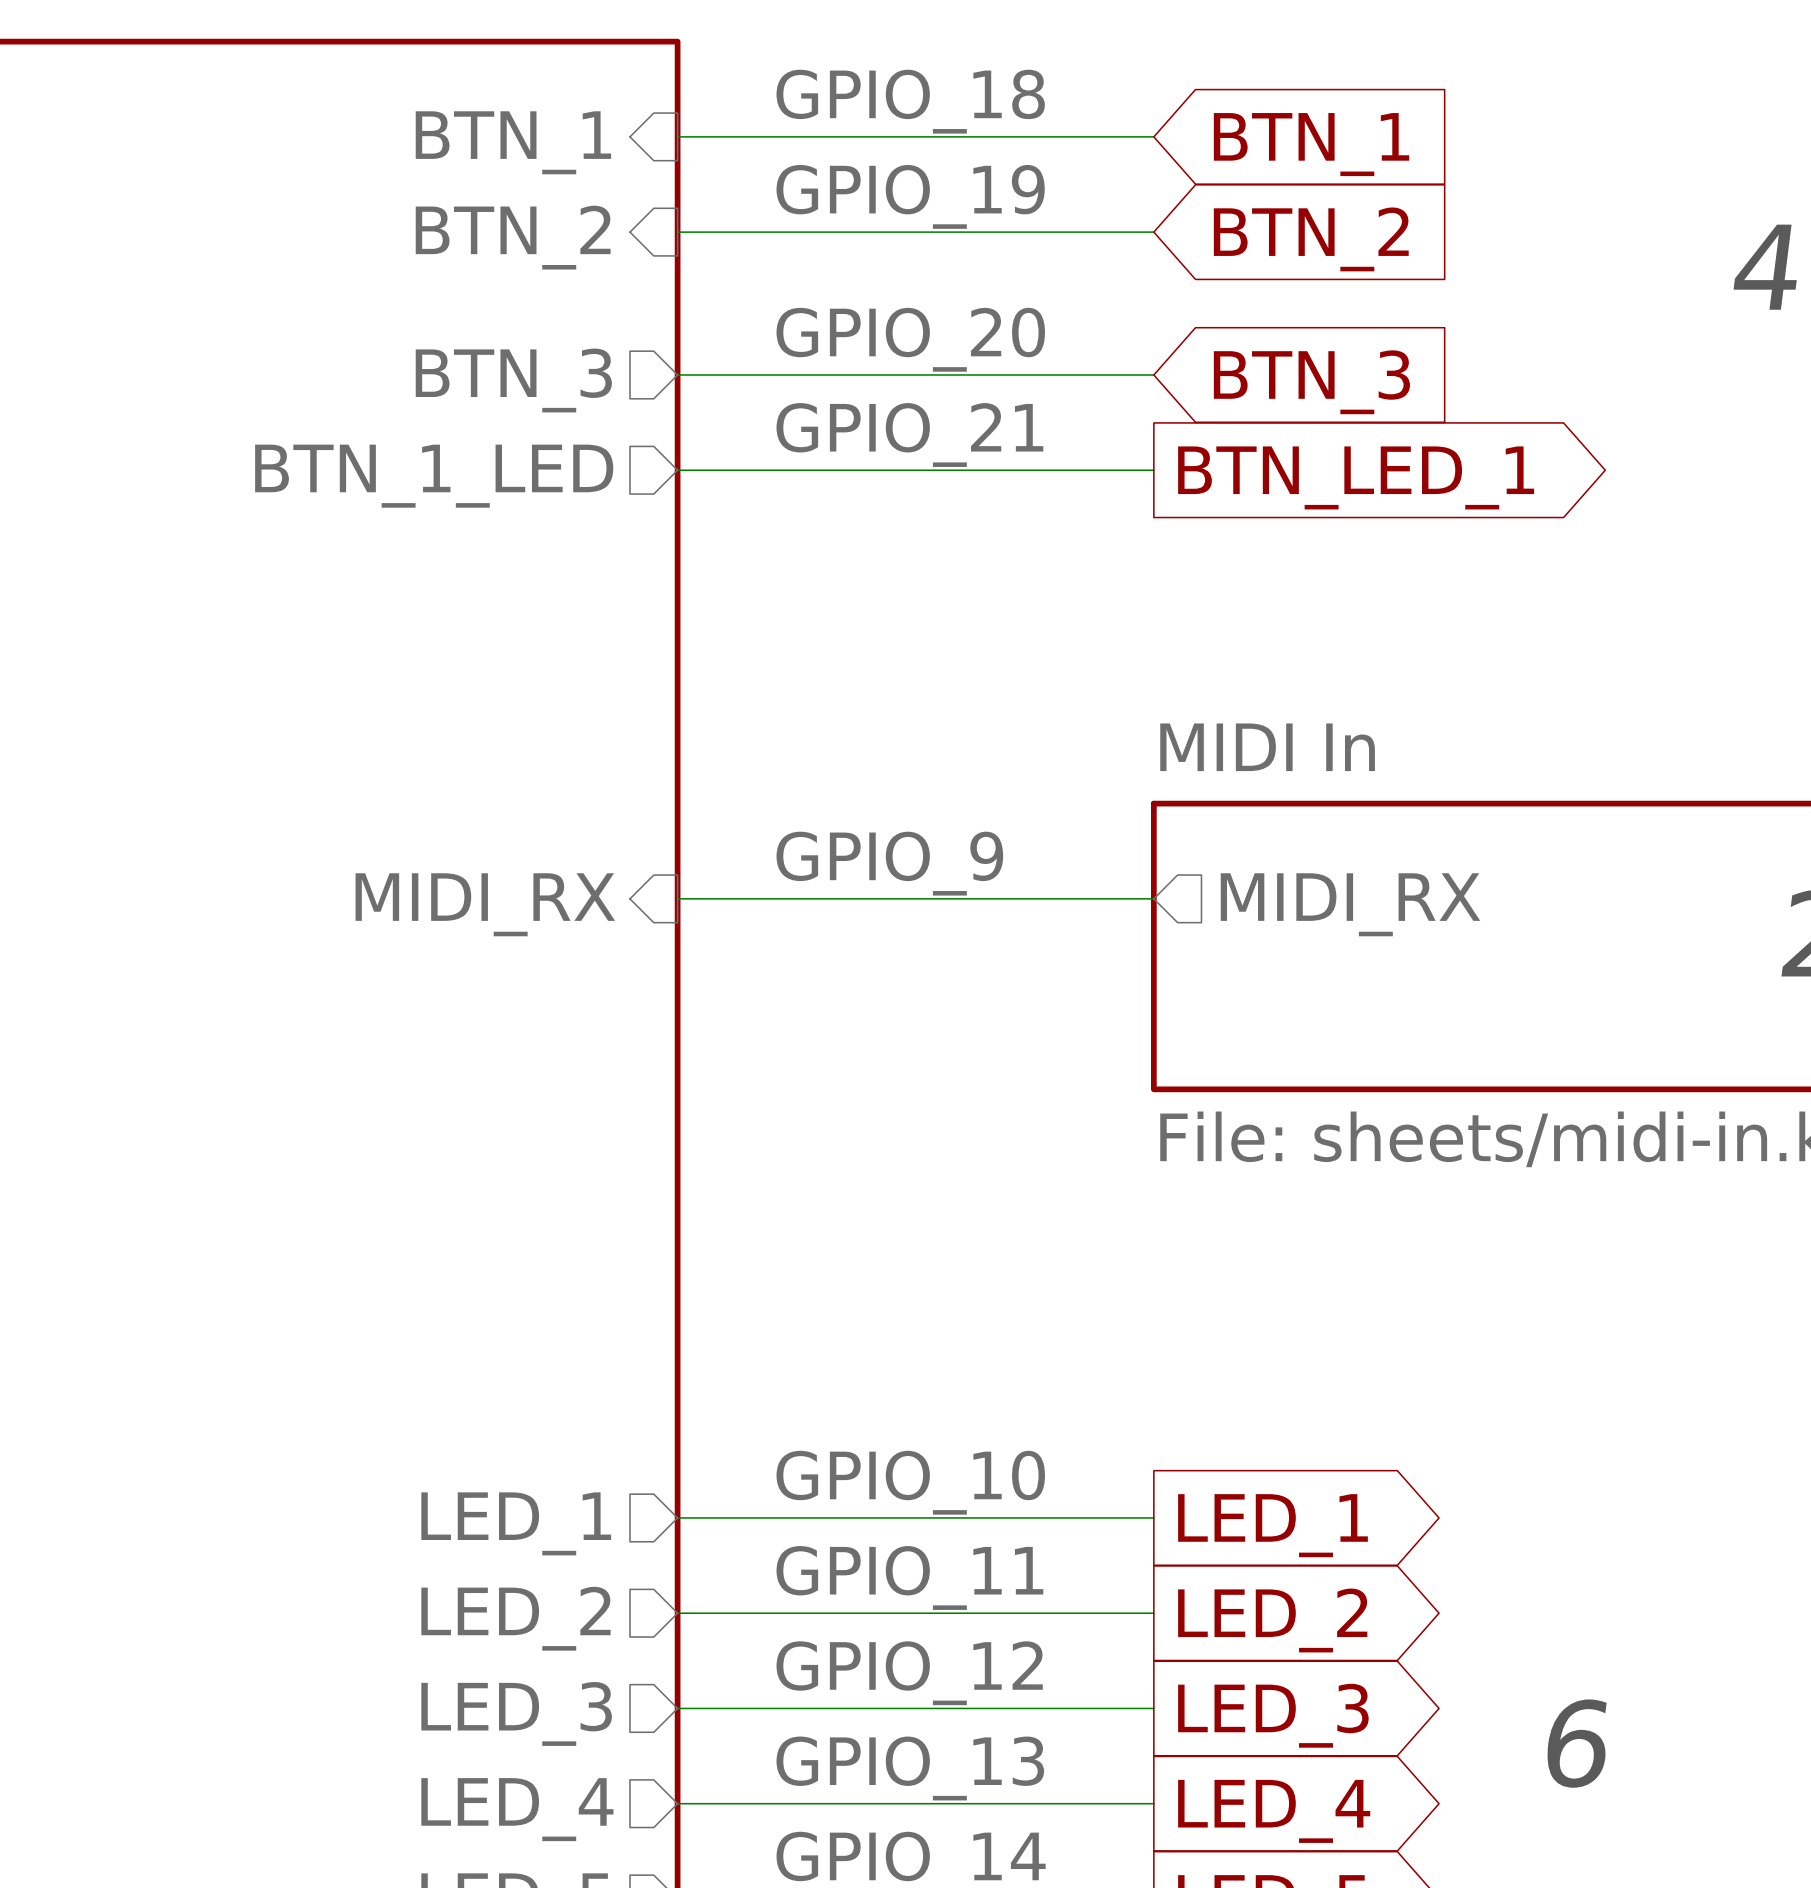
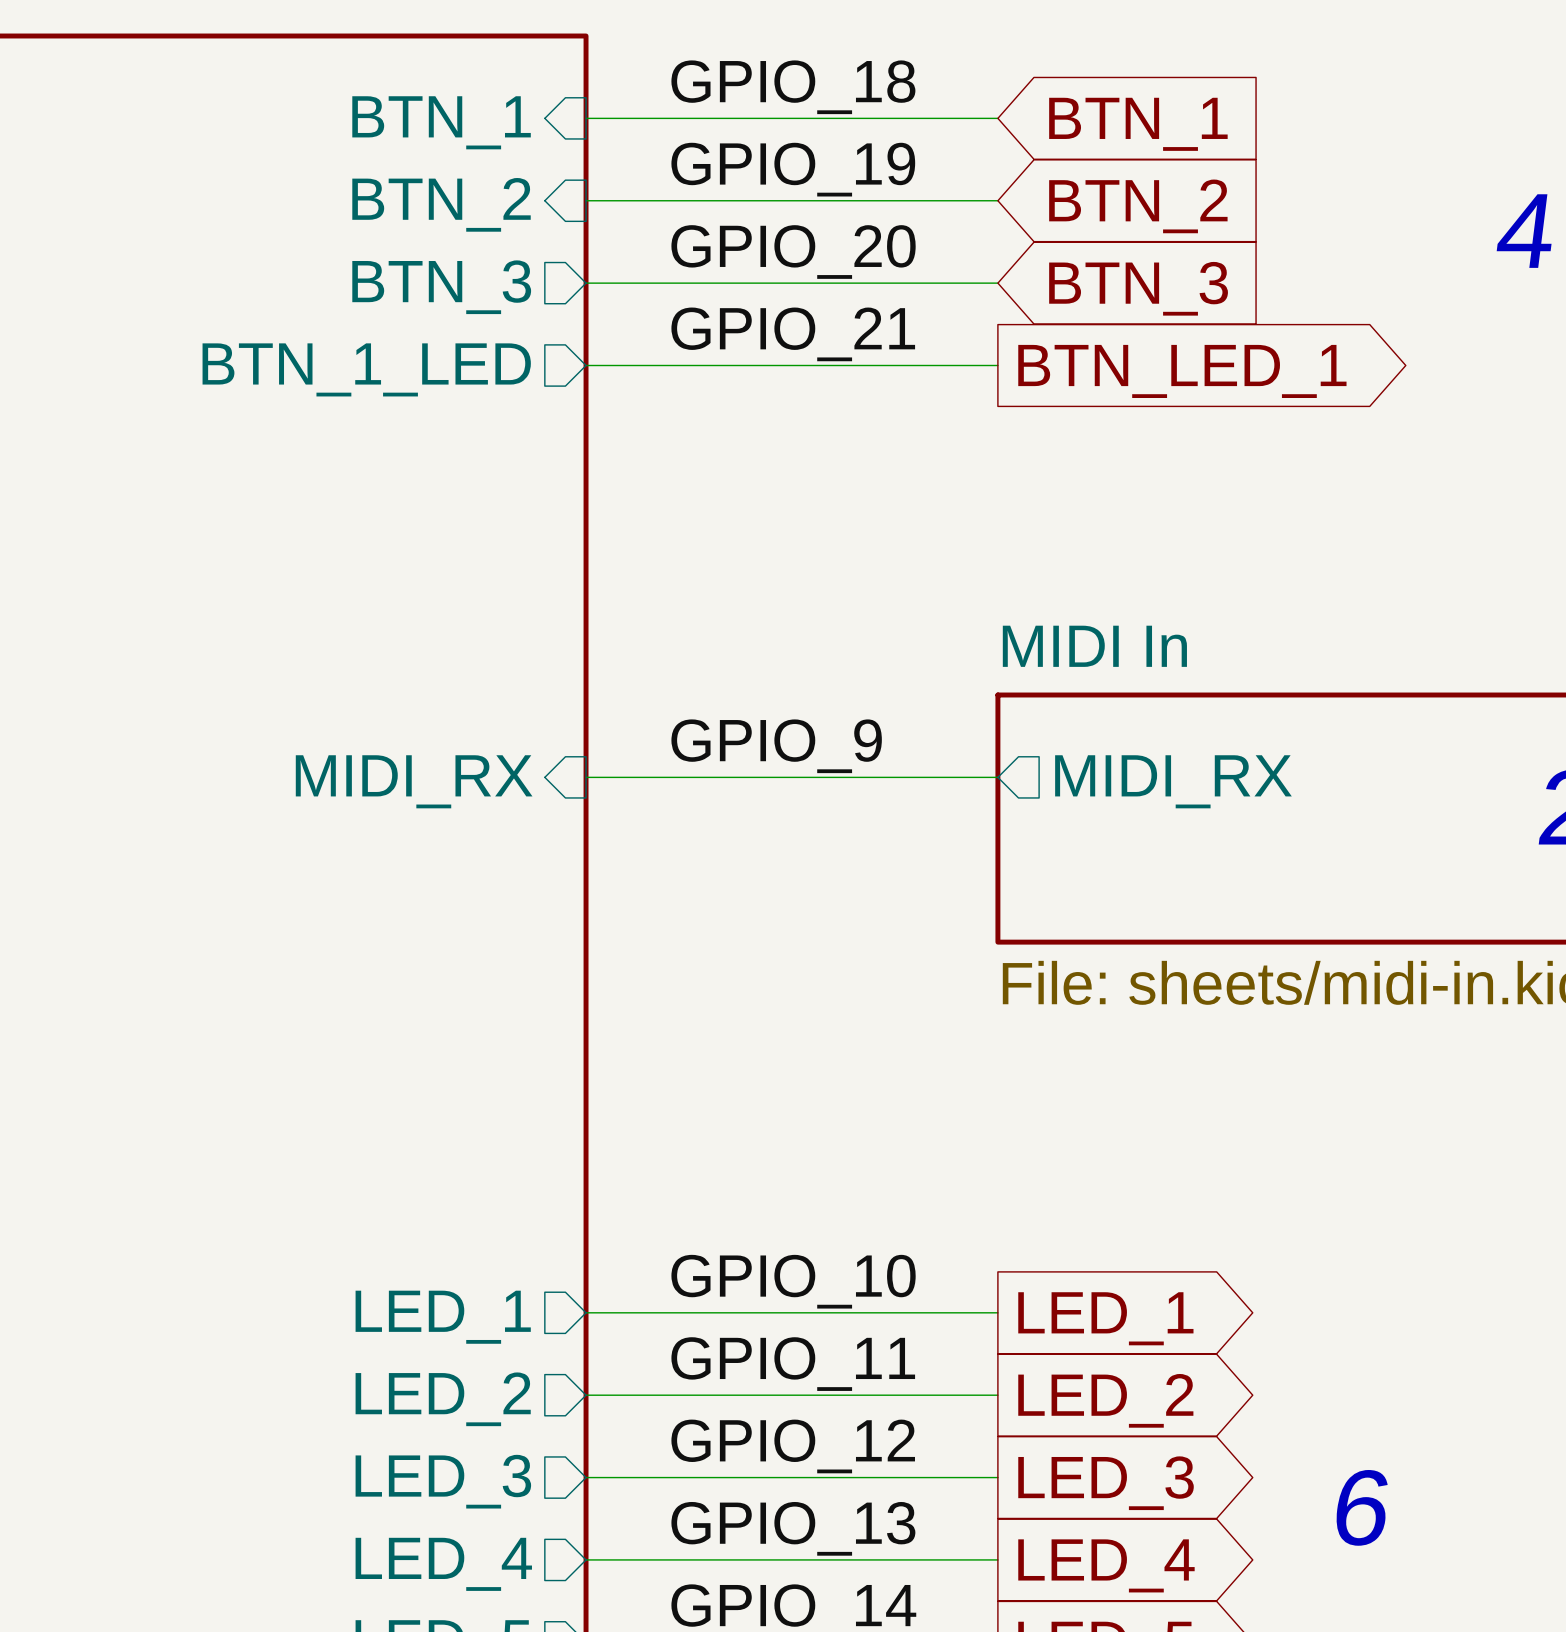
label position: GPIO_20 (910, 339) -> GPIO_20 (793, 252)
wire: (677, 374) (1153, 374) -> (586, 283) (997, 283)
sheet pin position: BTN_3 (513, 380) -> BTN_3 (441, 287)
global label position: BTN_3 (1311, 382) -> BTN_3 (1138, 288)
label position: GPIO_21 (909, 435) -> GPIO_21 (793, 334)
wire: (677, 470) (1153, 470) -> (586, 365) (997, 365)
sheet pin position: BTN_1_LED (434, 476) -> BTN_1_LED (366, 369)
global label position: BTN_LED_1 (1356, 477) -> BTN_LED_1 (1182, 371)

